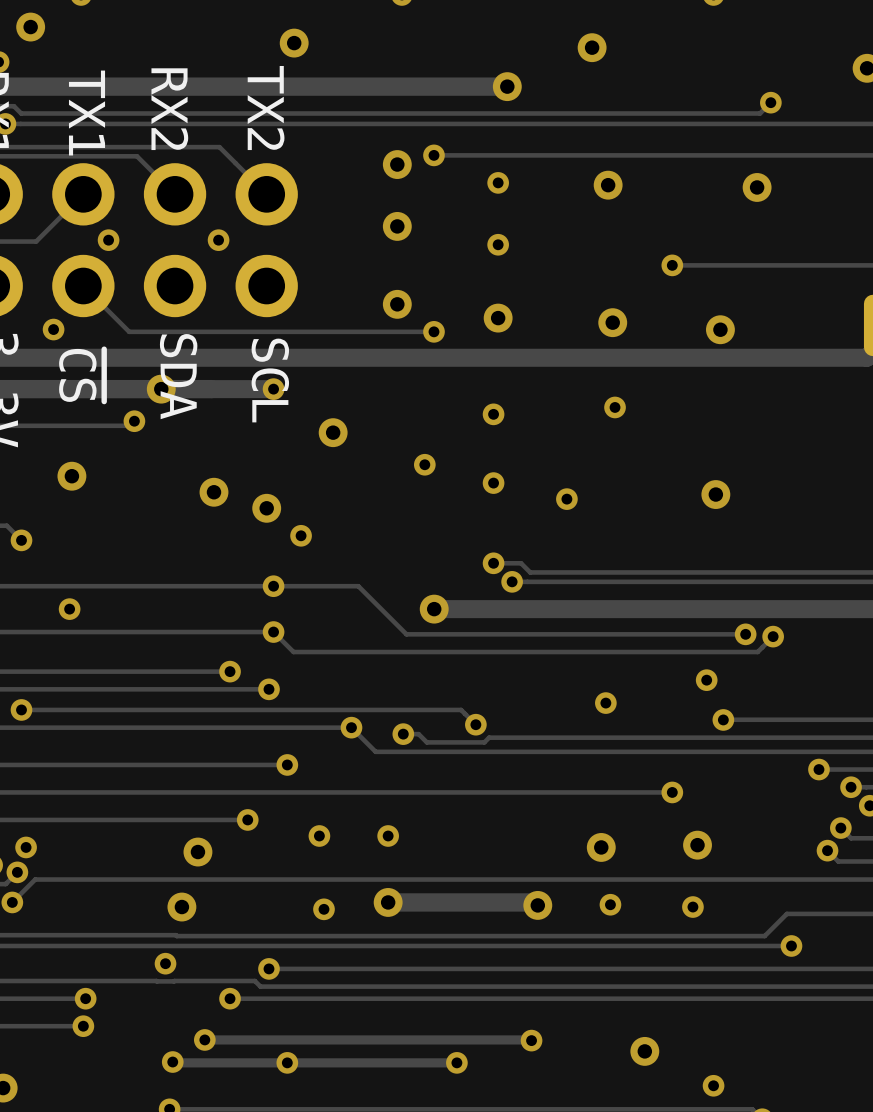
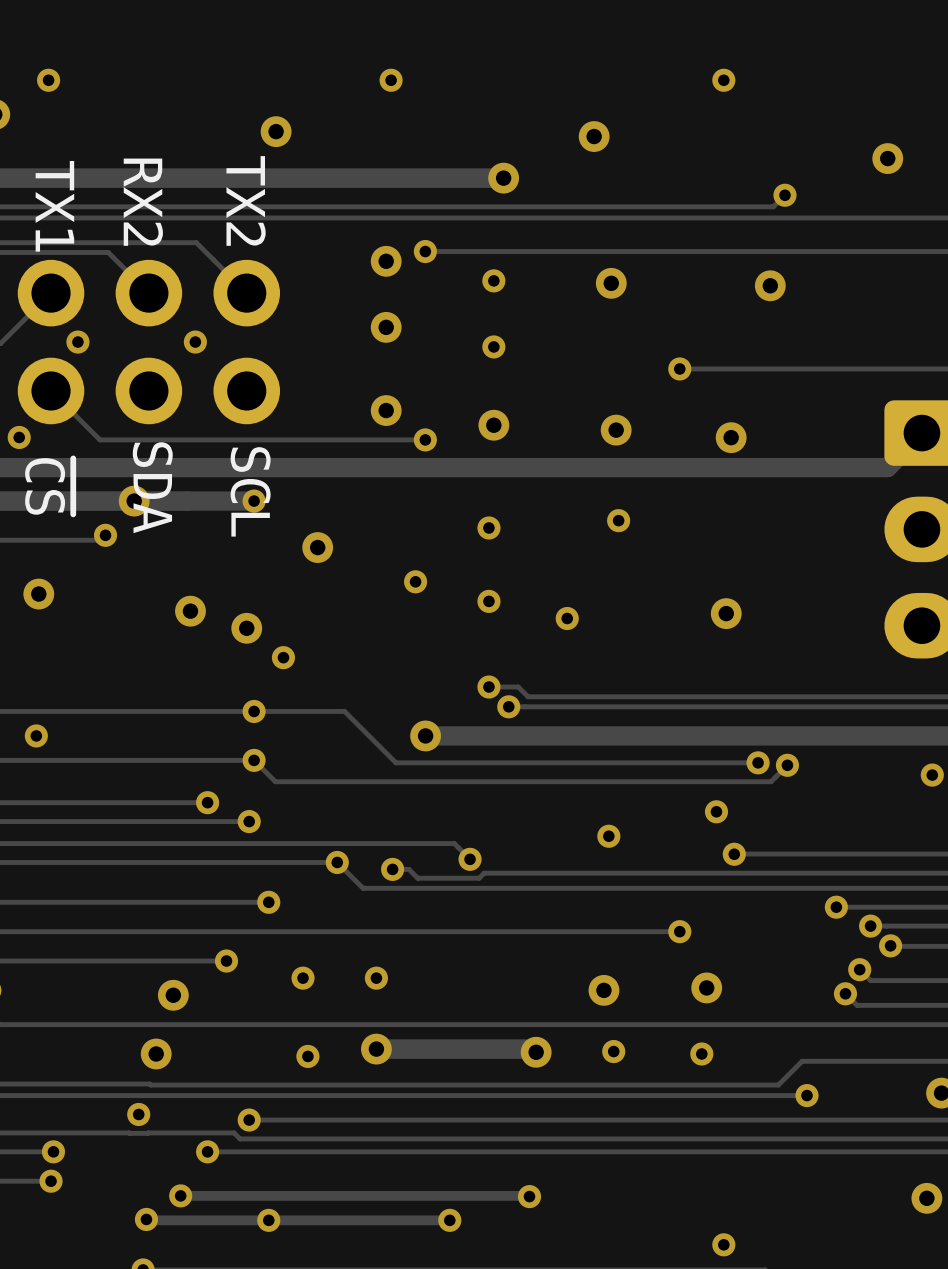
via: (644, 1051) -> none

